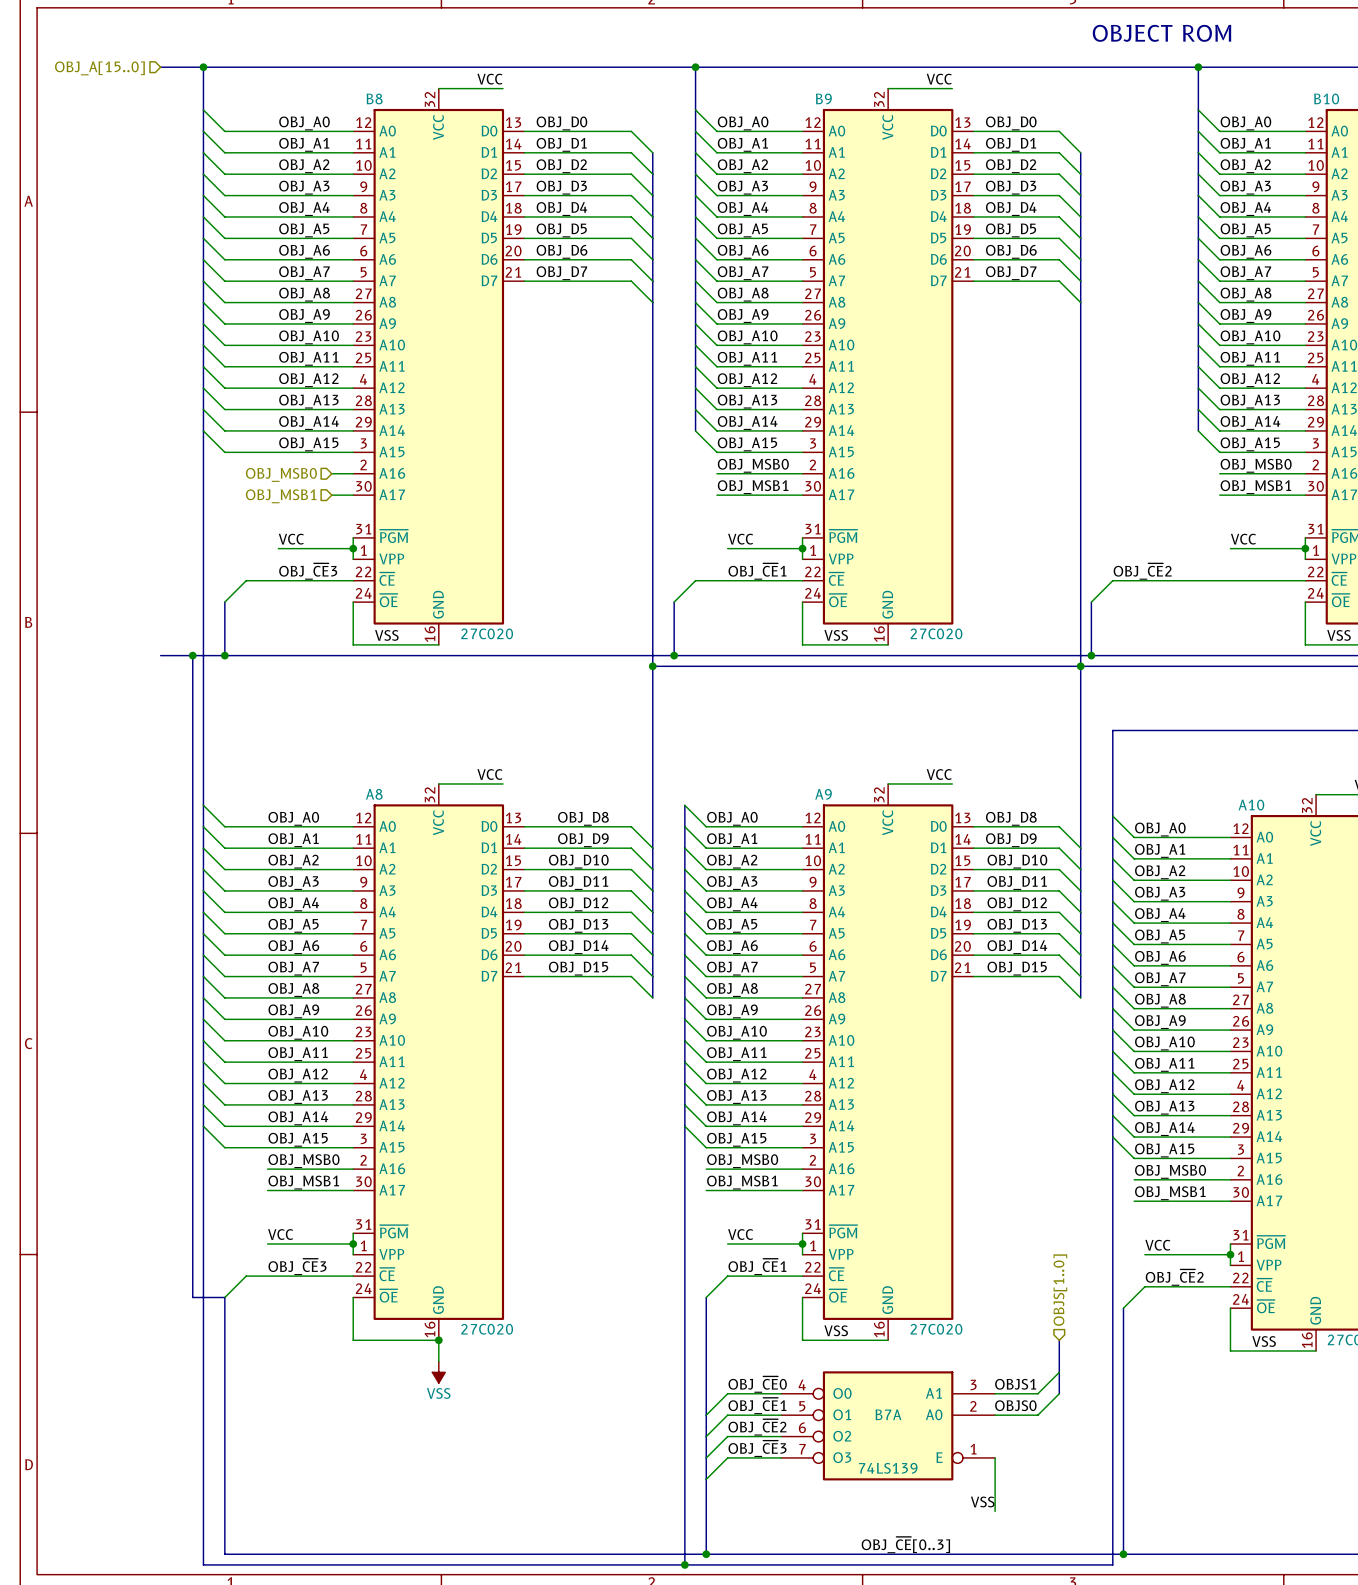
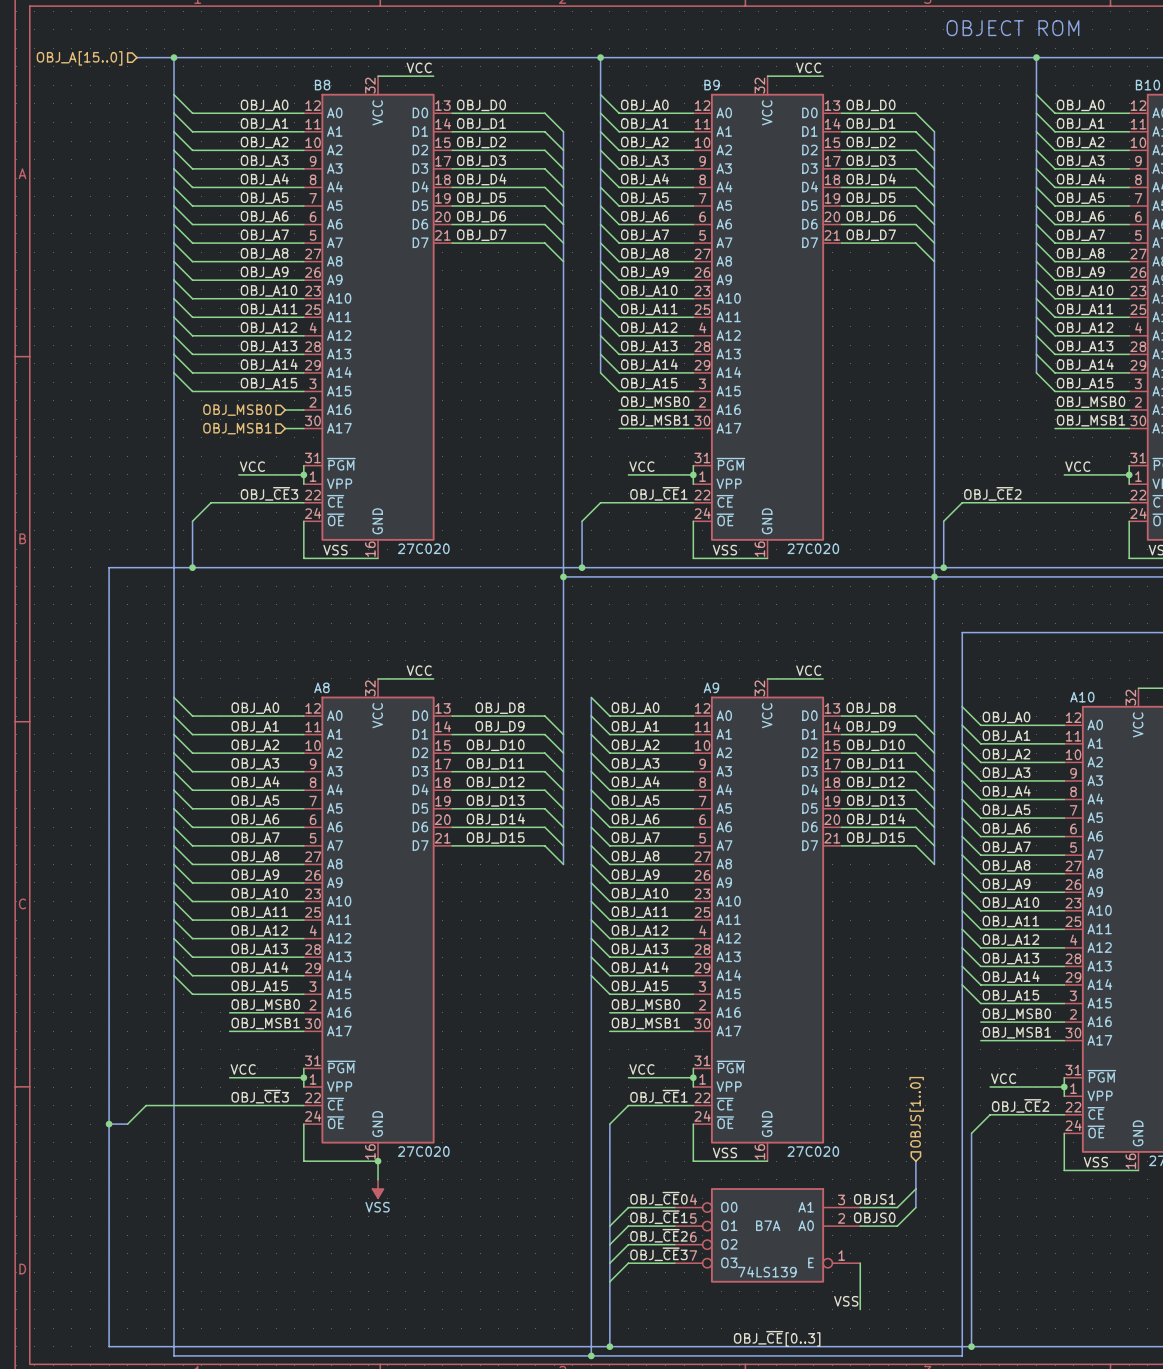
bus: (192, 655) (192, 1297) (224, 1297) (224, 1554) -> (136, 567) (109, 567) (109, 1346) (192, 1346)
junction: (192, 655) -> none
wire: (246, 1276) (224, 1297) -> (211, 1105) (146, 1105) (127, 1124)
bus: none -> (109, 1124) (127, 1124)
junction: none -> (109, 1124)

